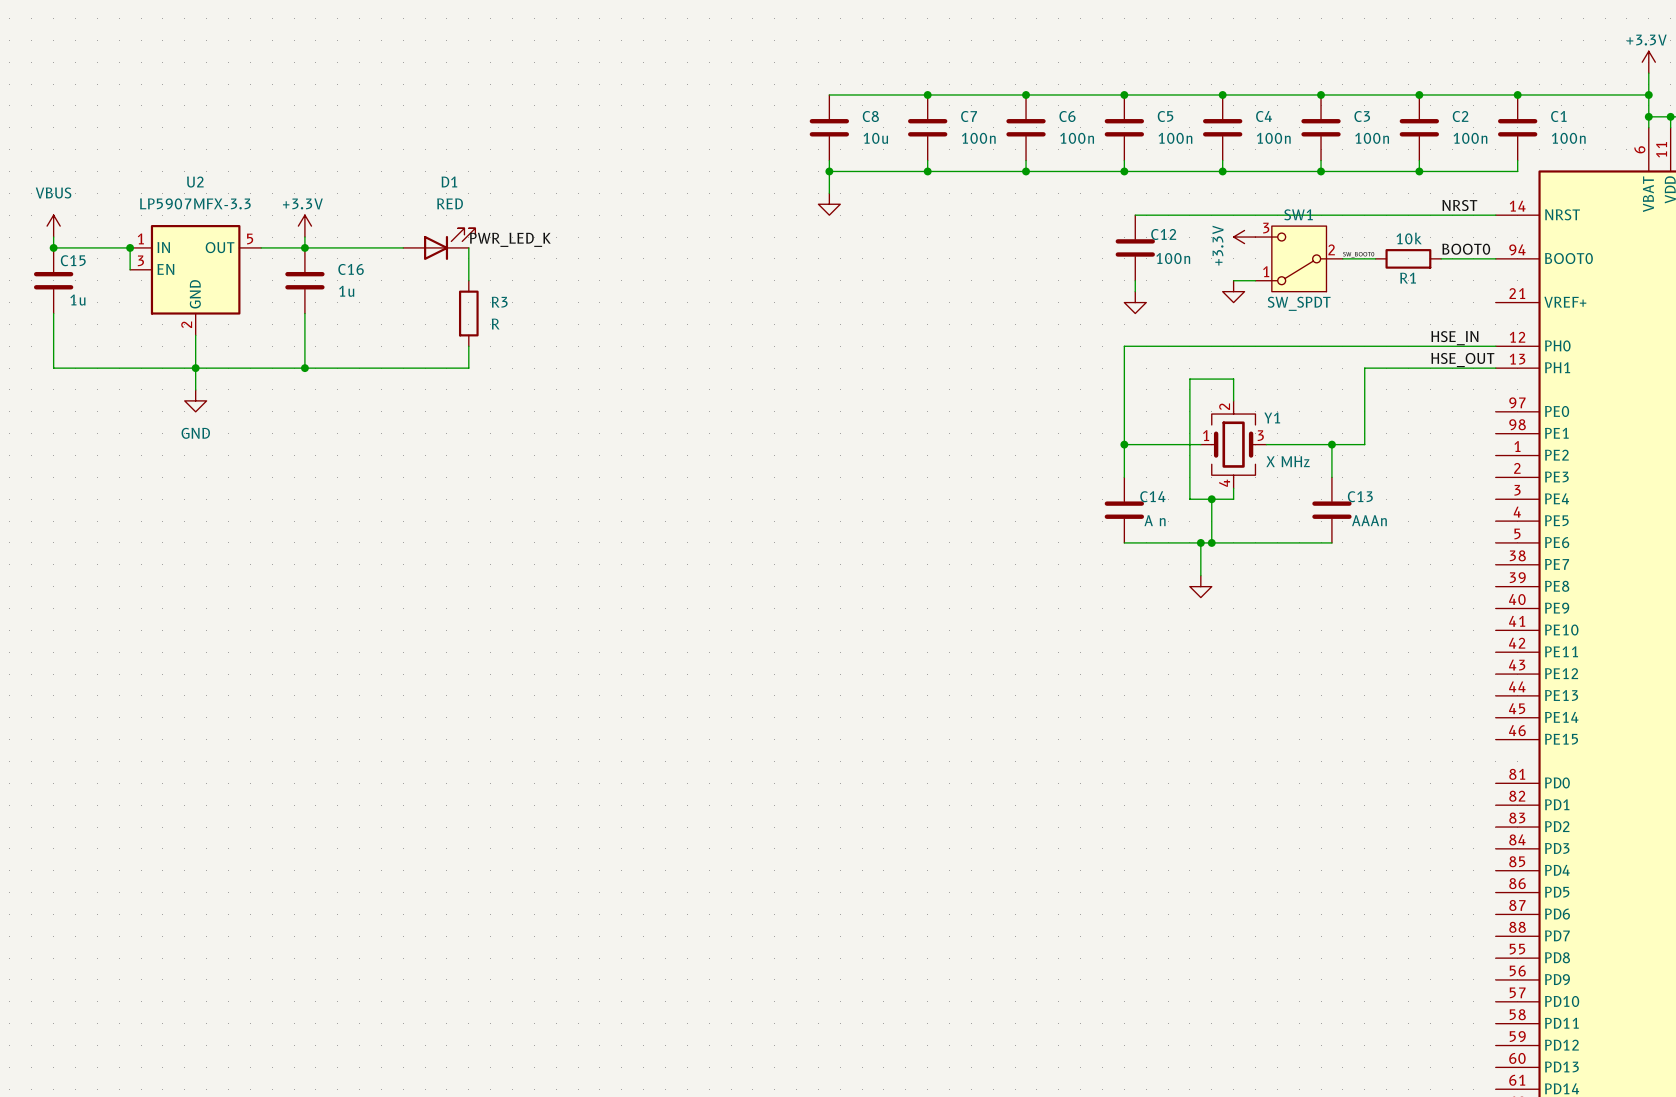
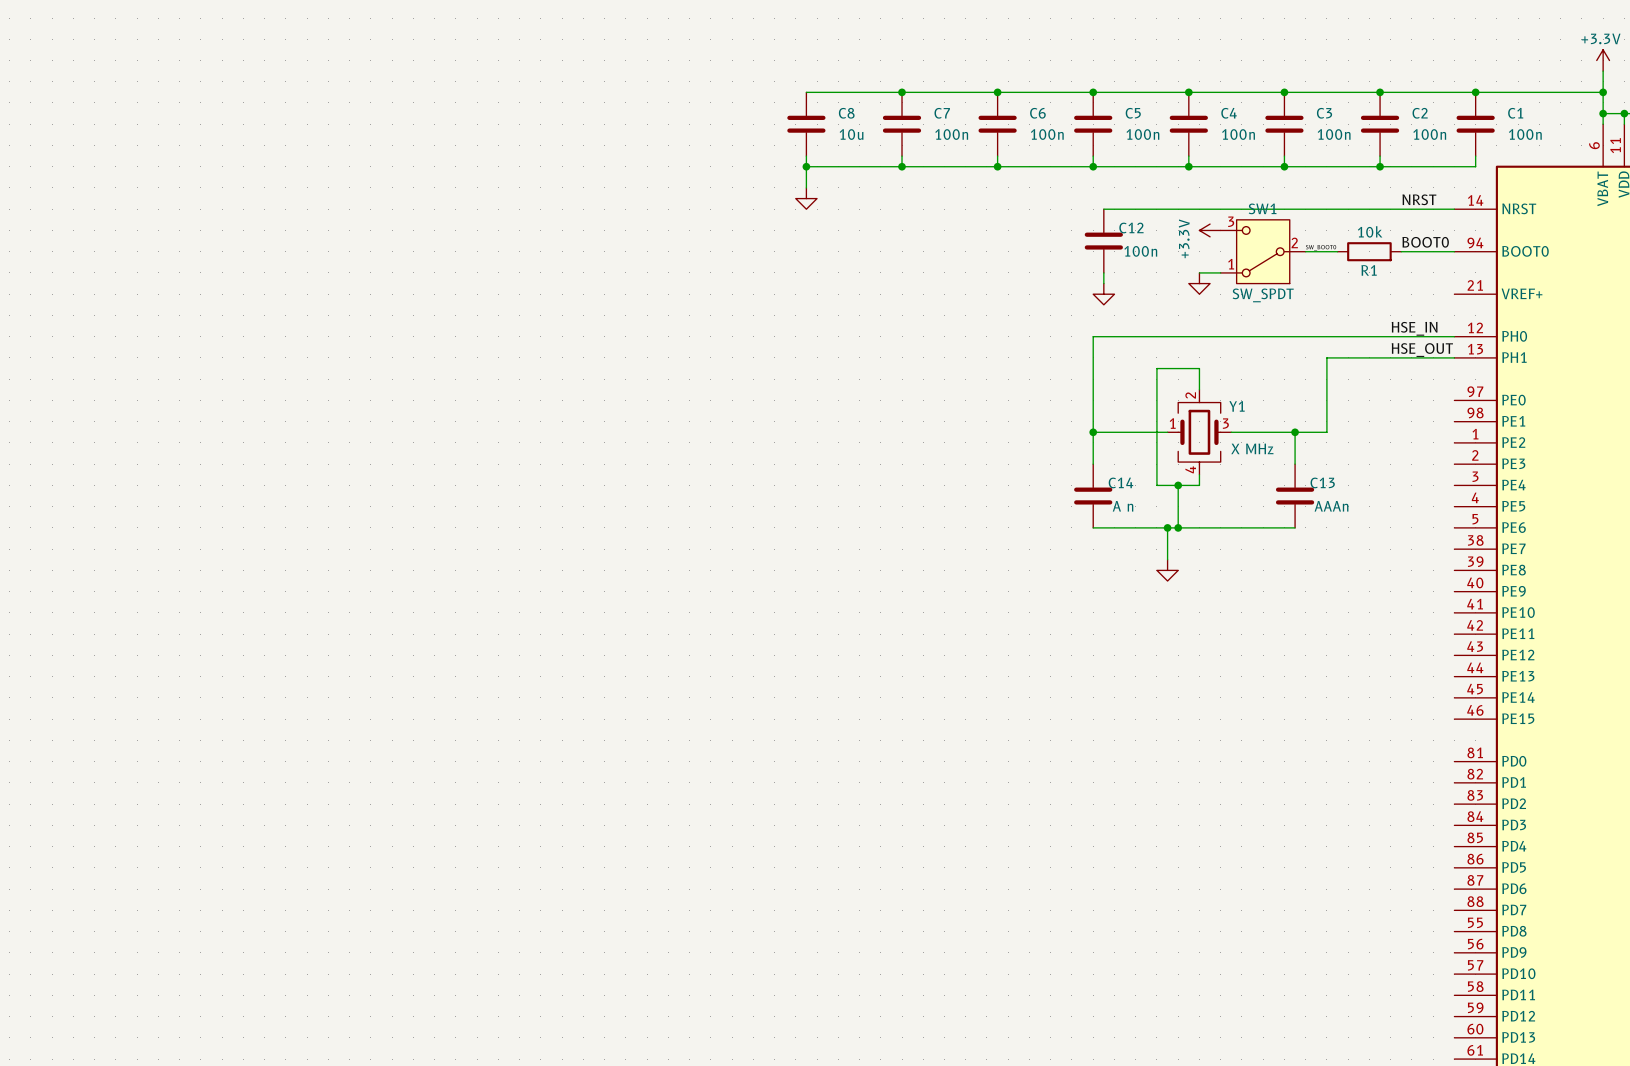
power symbol: VBUS (53, 226) -> none
power symbol: +3.3V (304, 226) -> none
wire: (53, 237) (53, 247) (130, 247) (130, 269) -> none
wire: (304, 237) (304, 247) -> none
label: PWR_LED_K (510, 239) -> none
D1: RED (439, 244) -> none
junction: (53, 247) -> none
junction: (130, 247) -> none
wire: (261, 247) (403, 247) -> none
junction: (304, 247) -> none
wire: (468, 247) (468, 280) -> none
C15: 1u (53, 280) -> none
U2: LP5907MFX-3.3 (195, 280) -> none
C16: 1u (304, 280) -> none
wire: (53, 313) (53, 368) (468, 368) (468, 346) -> none
wire: (304, 313) (304, 368) -> none
R3: R (468, 313) -> none
wire: (195, 335) (195, 389) -> none
junction: (195, 368) -> none
junction: (304, 368) -> none
power symbol: GND (195, 400) -> none

